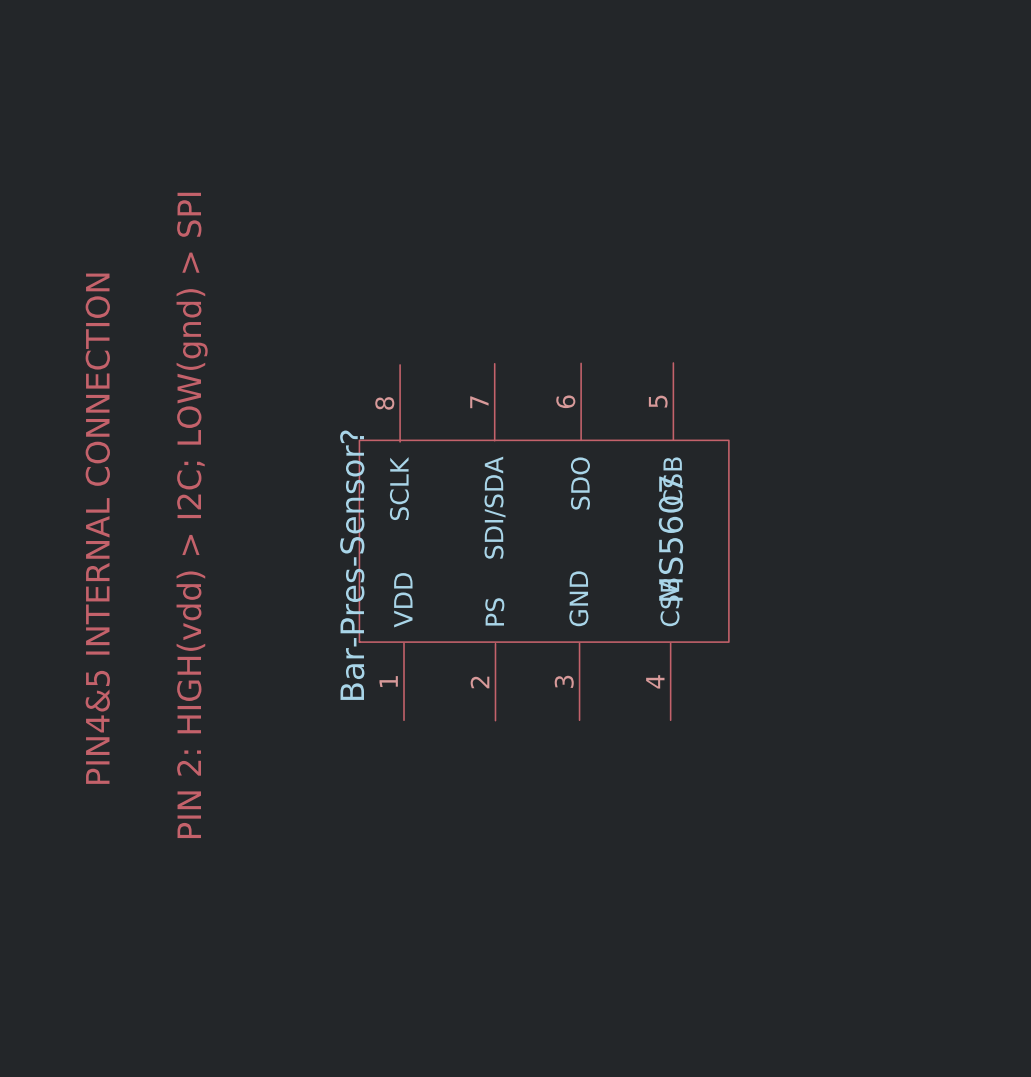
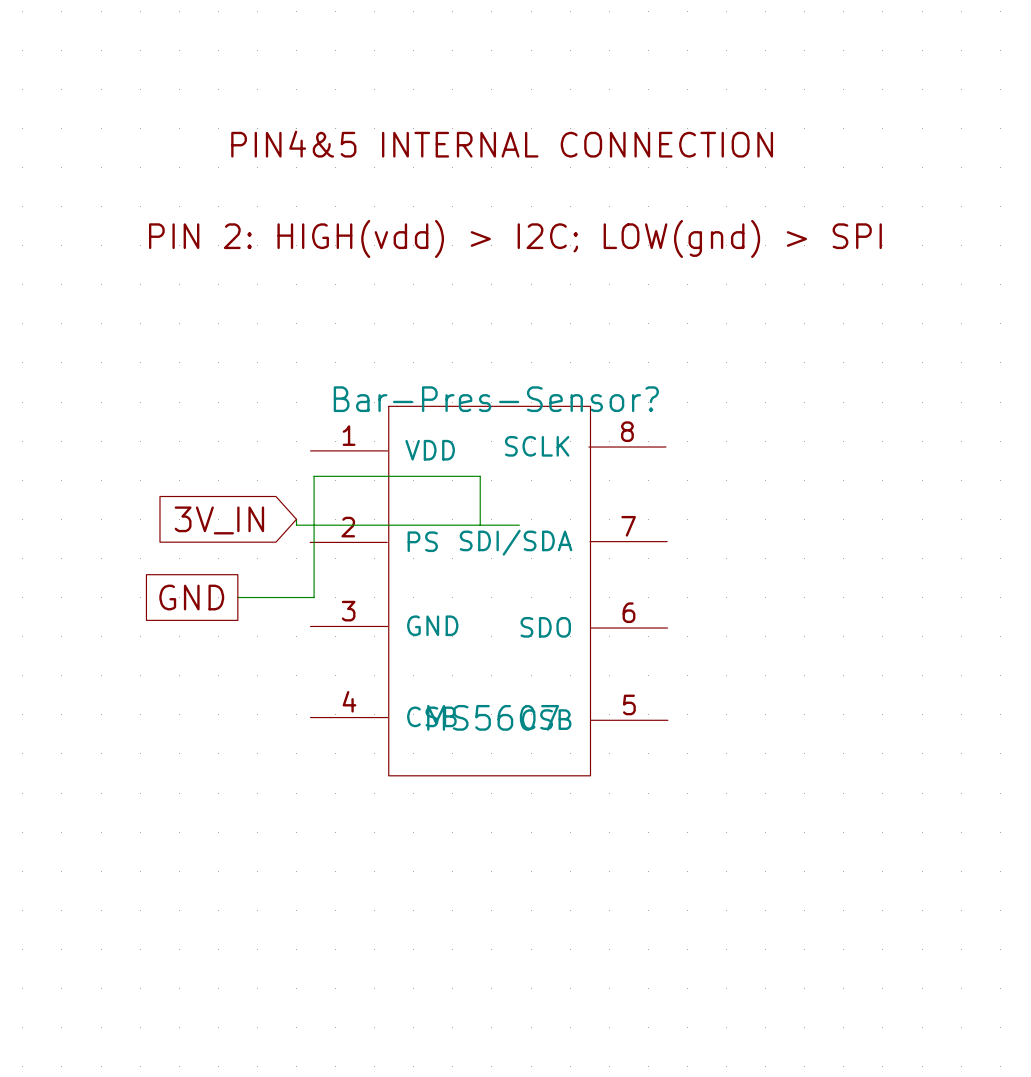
wire: none -> (296, 519) (296, 525) (519, 525)
global label: none -> 3V_IN (219, 520)
wire: none -> (480, 525) (480, 476) (314, 476) (314, 597) (237, 597)
Bar-Pres-Sensor? rotation: 0° (544, 541) -> 90° clockwise (489, 591)
global label: none -> GND (191, 597)

